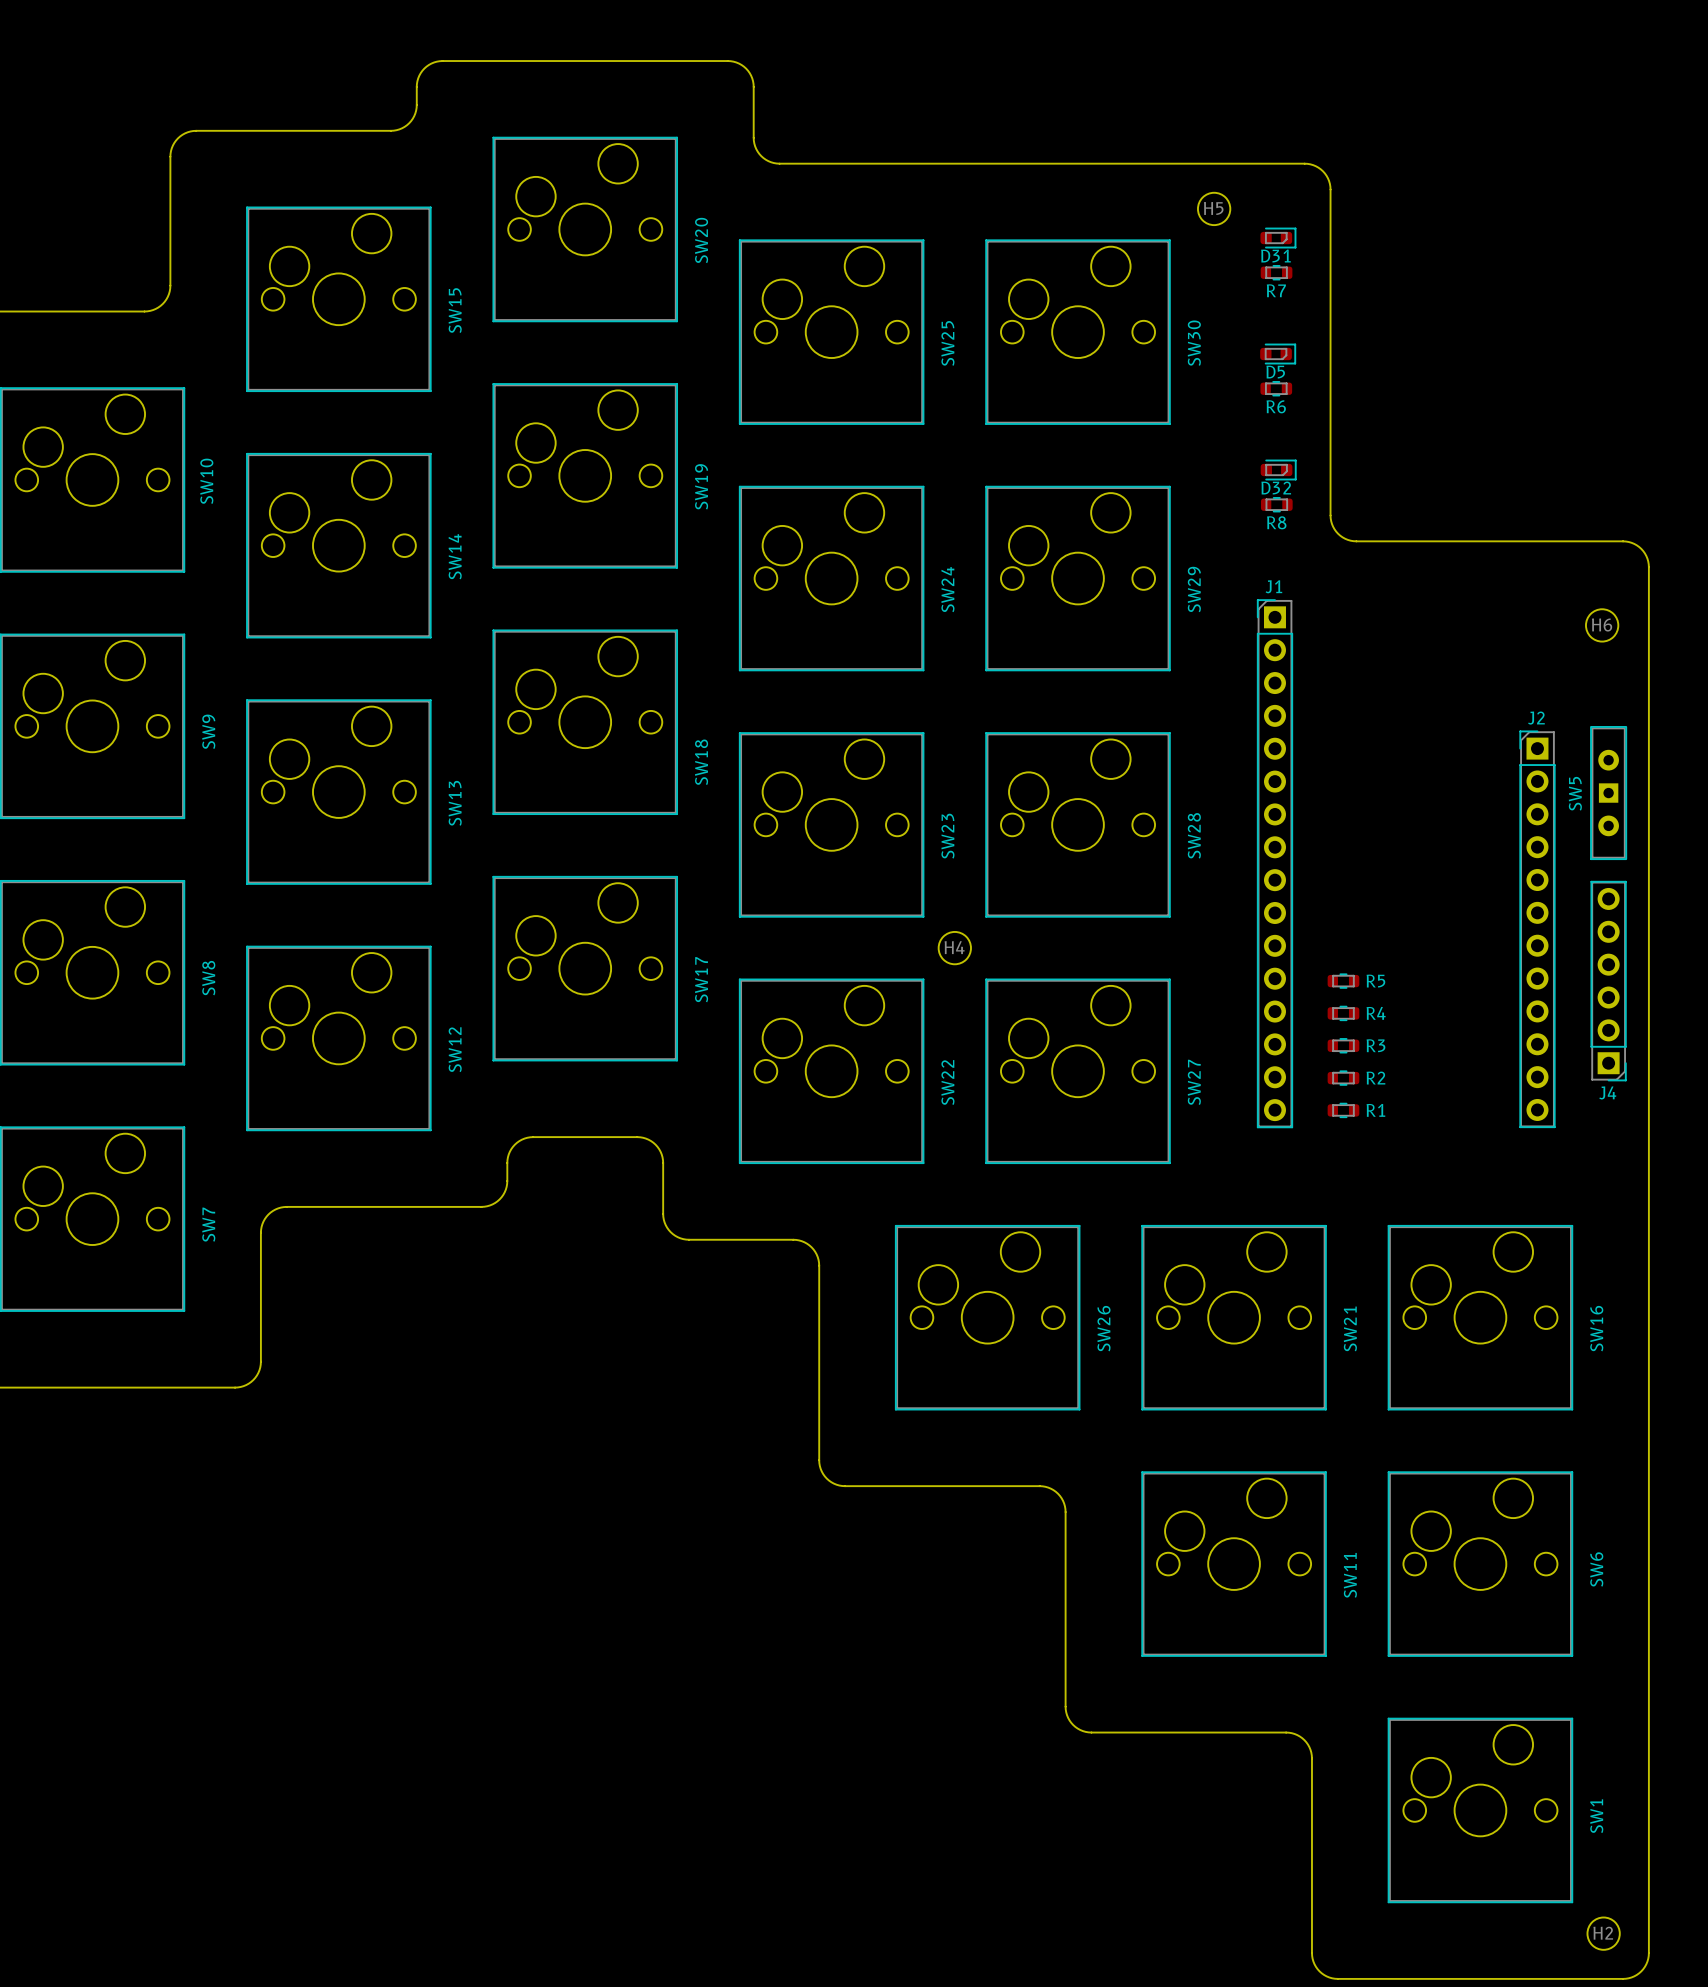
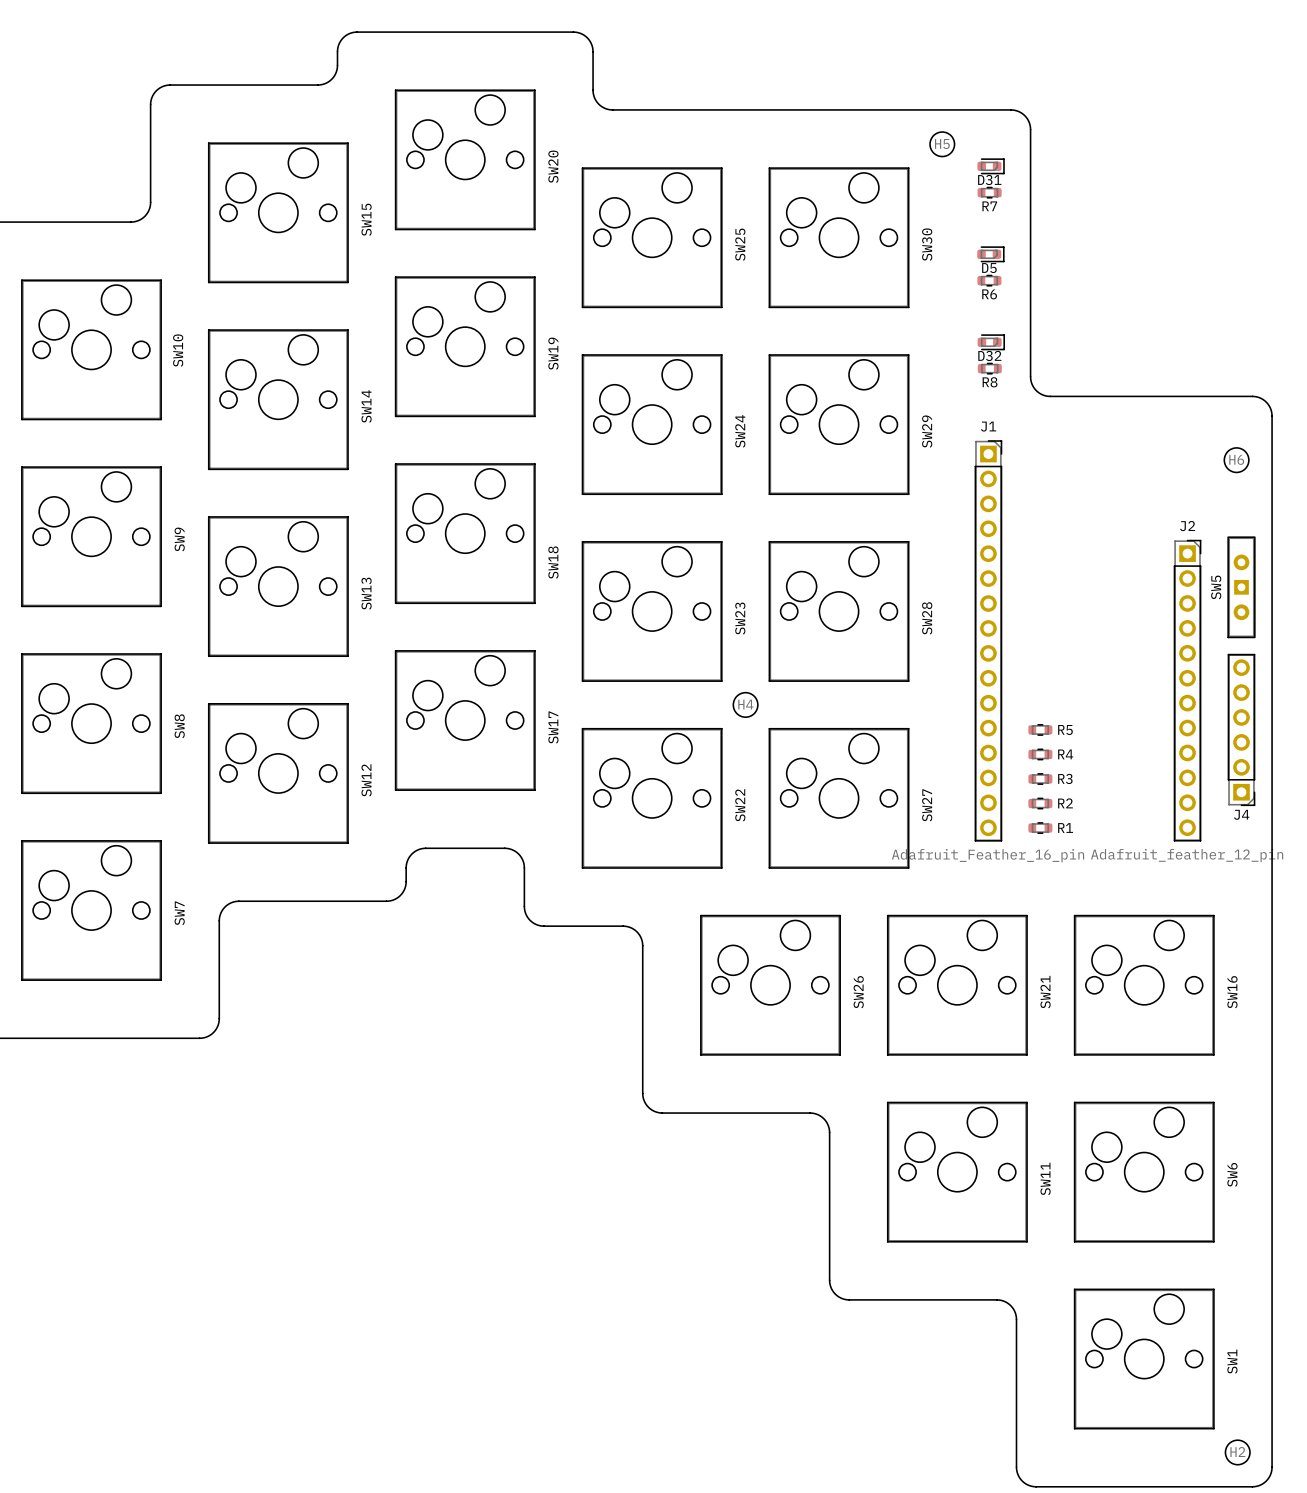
J1 footprint: [1257, 599, 1293, 1129] -> [974, 440, 1003, 842]
J2 footprint: [1519, 730, 1556, 1128] -> [1173, 539, 1202, 842]
J1 value: none -> Adafruit_Feather_16_pin (988, 855)
J2 value: none -> Adafruit_feather_12_pin (1187, 855)

